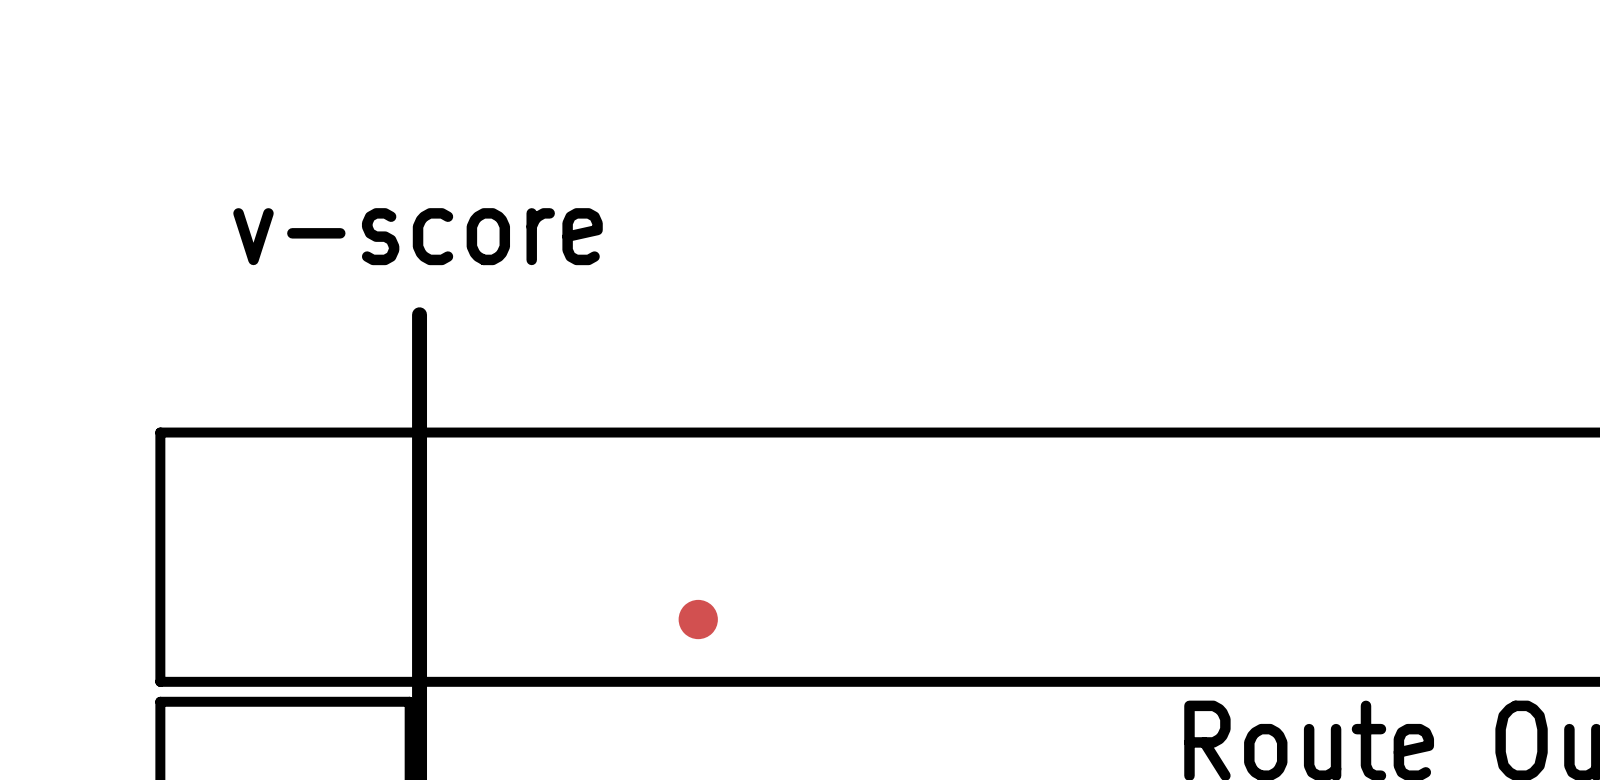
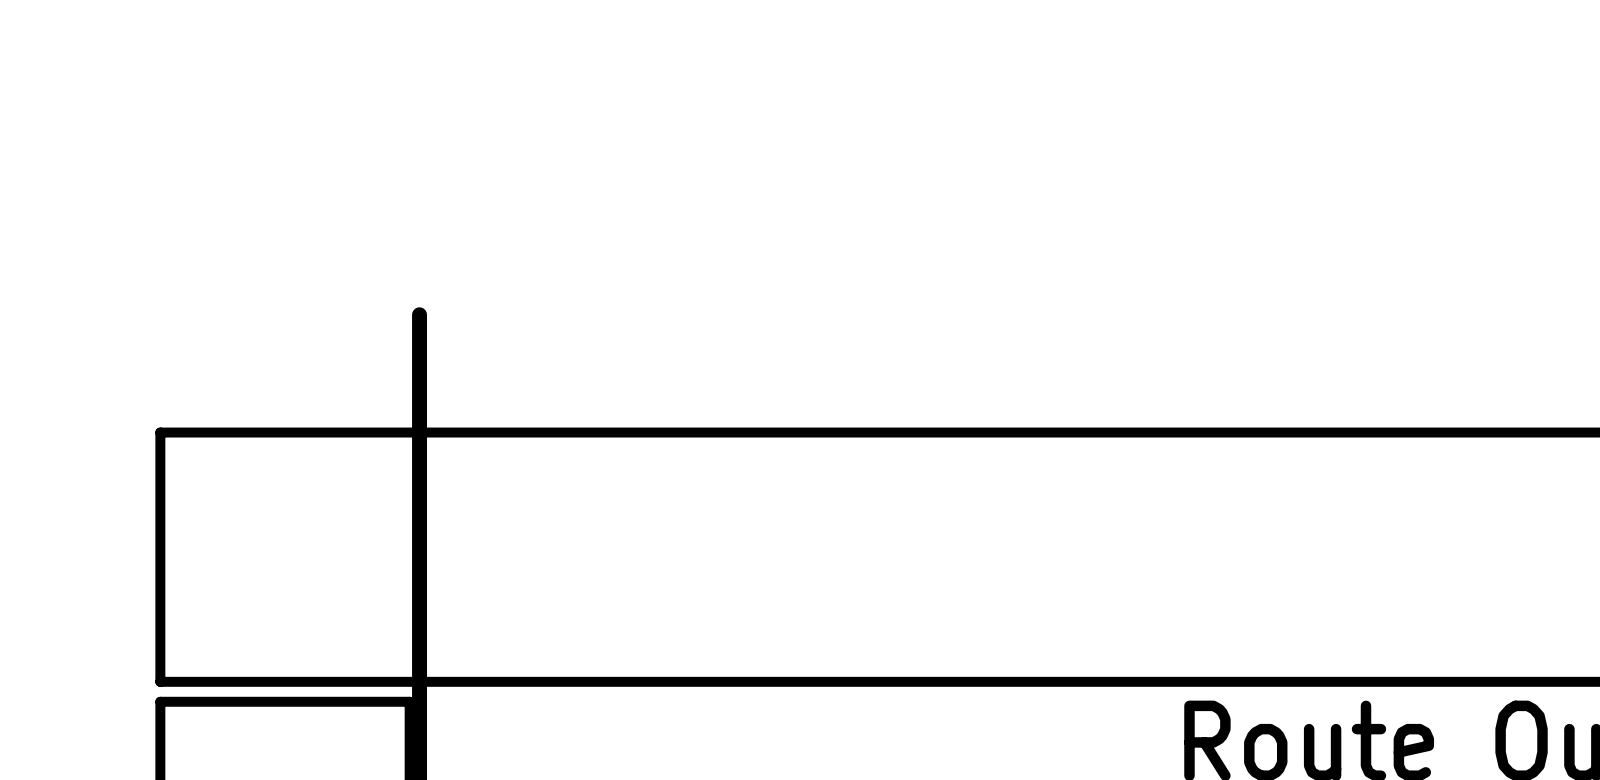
text: v-score (418, 236) -> none
part: (698, 619) -> none

